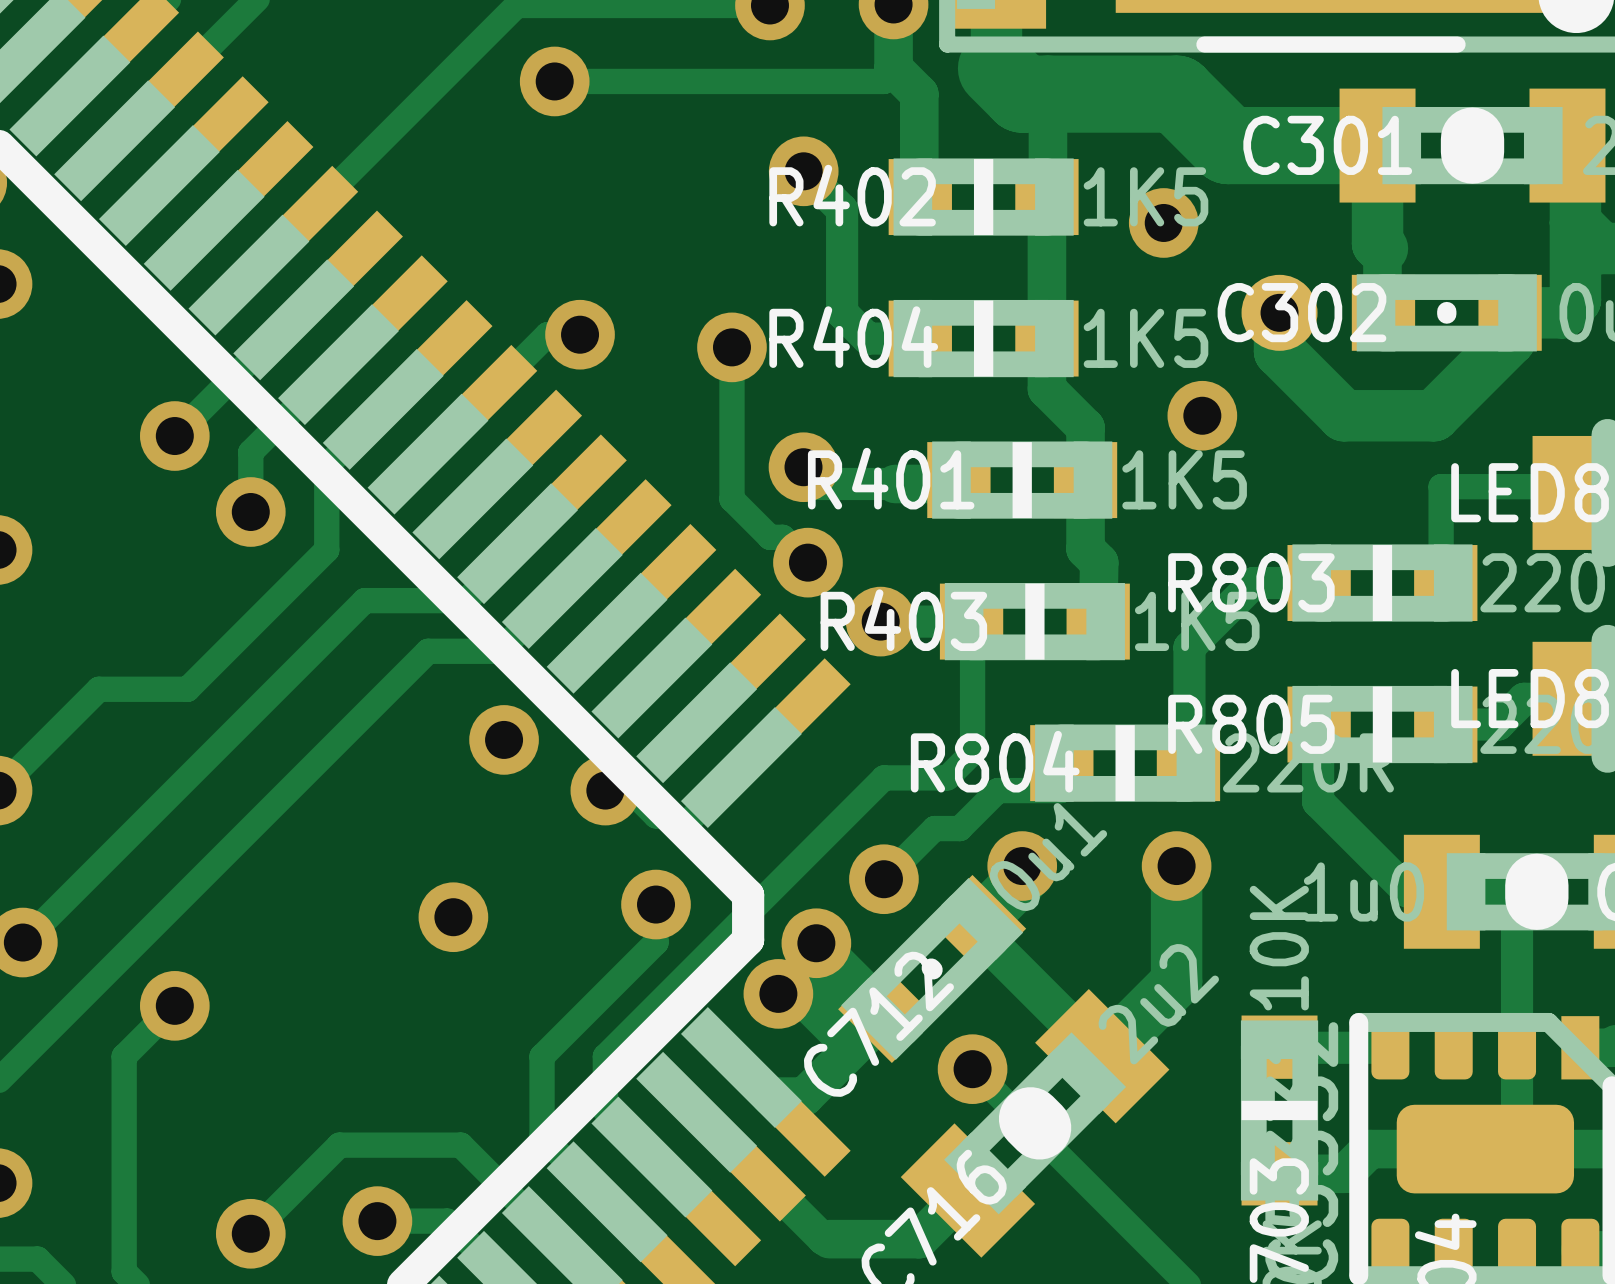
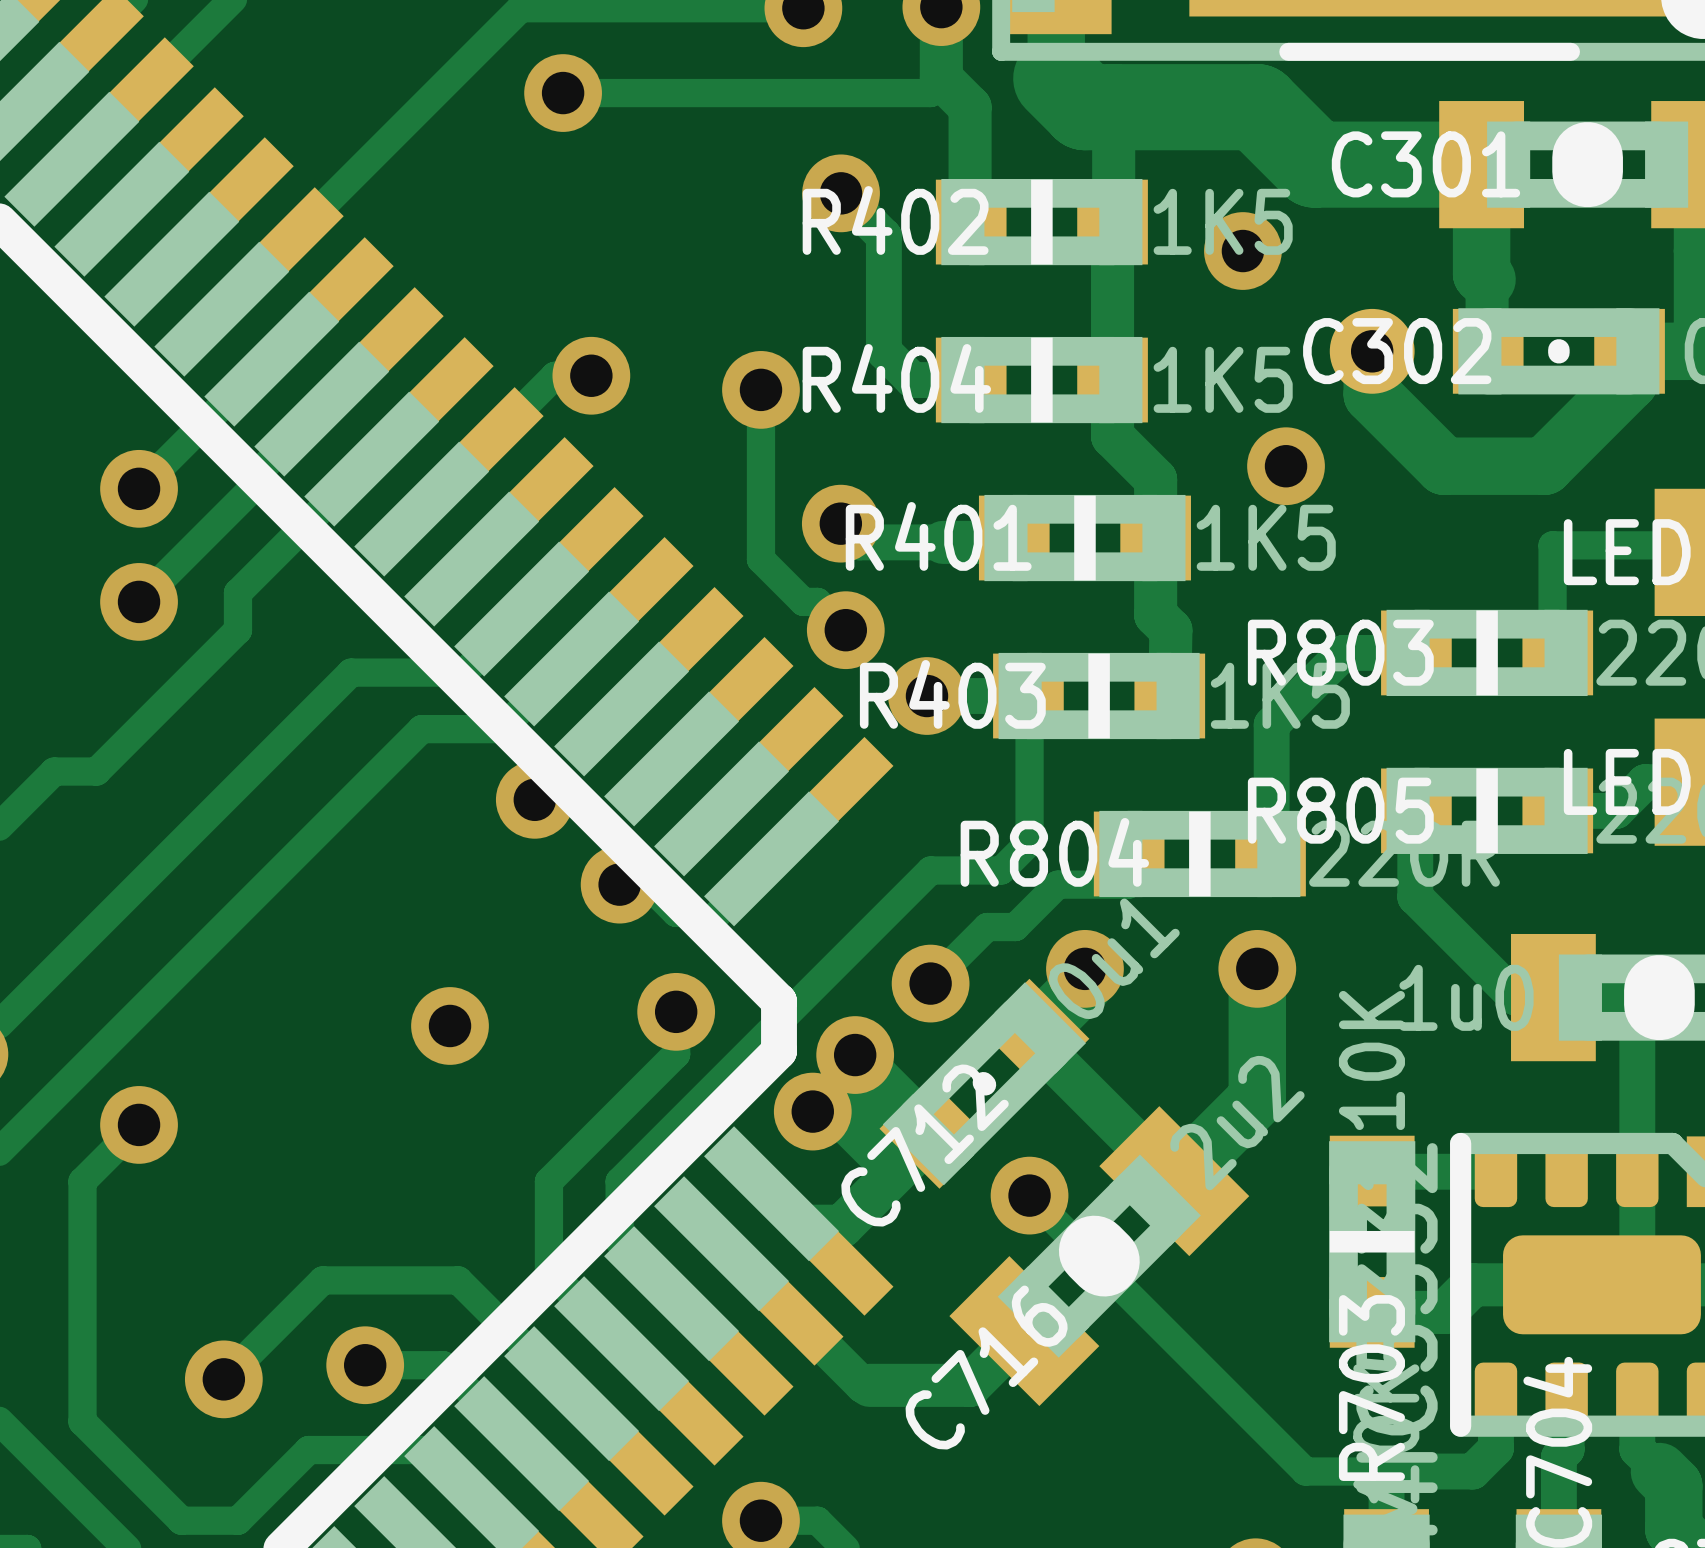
track: (276, 426) (250, 452) (250, 511) -> (252, 478) (252, 488) (139, 601)
track: (326, 465) (326, 549) (187, 689) (136, 689) -> (308, 522) (237, 592) (237, 630) (96, 771)
via position: (250, 511) -> (139, 601)
via position: (504, 739) -> (534, 799)

